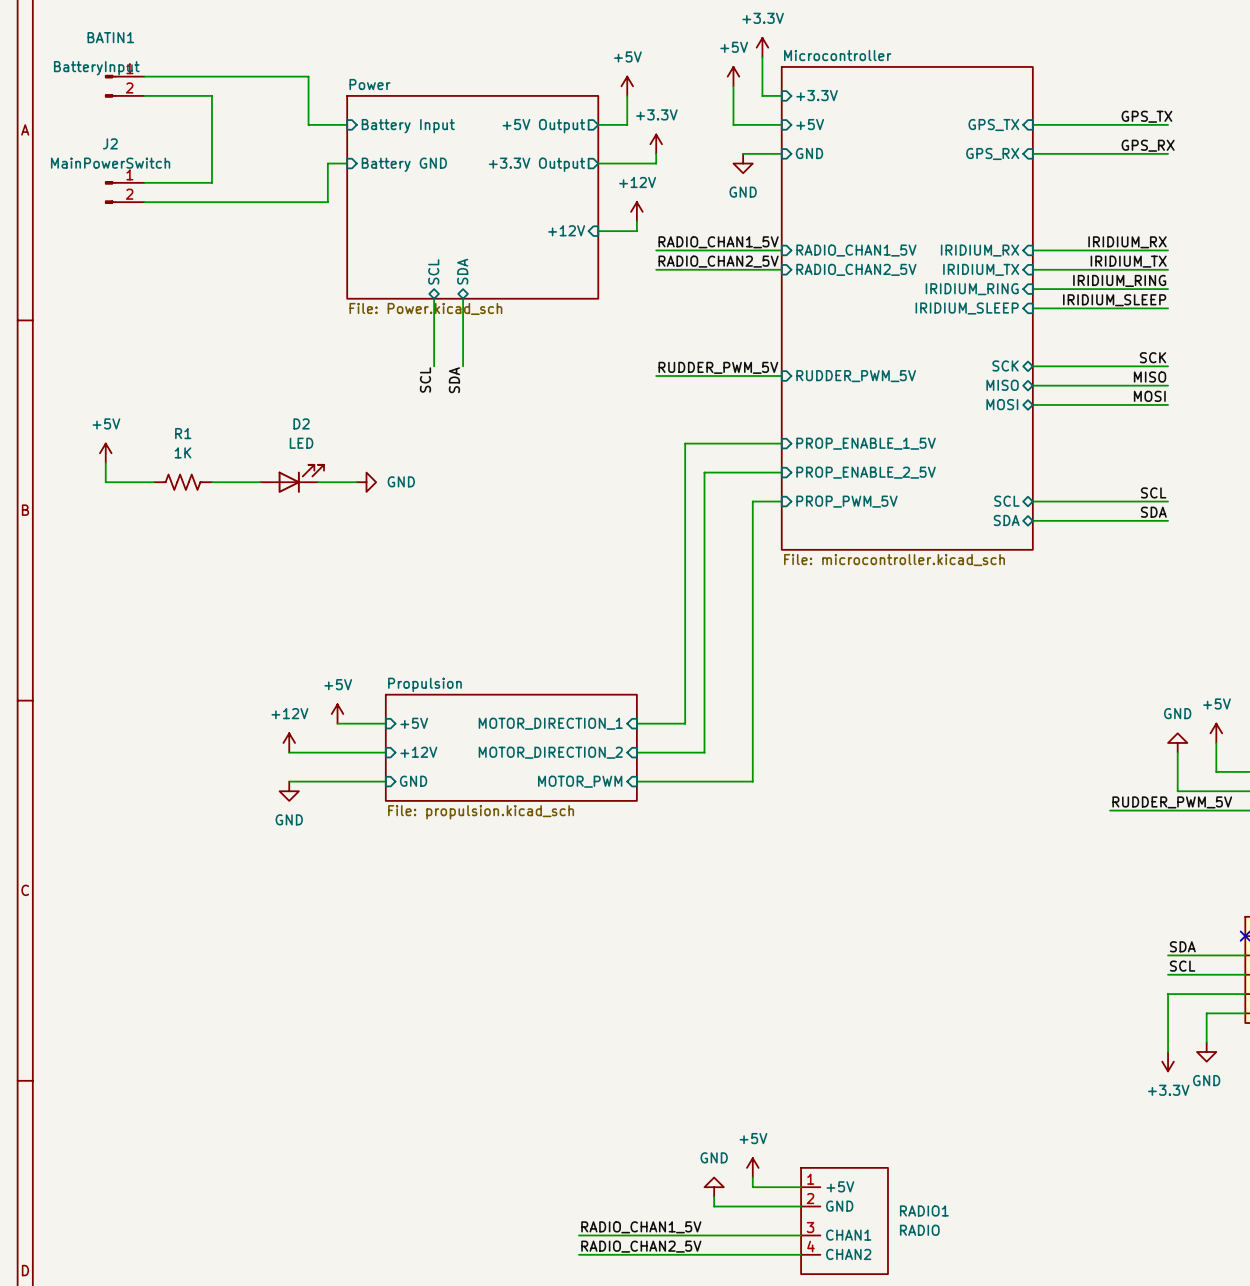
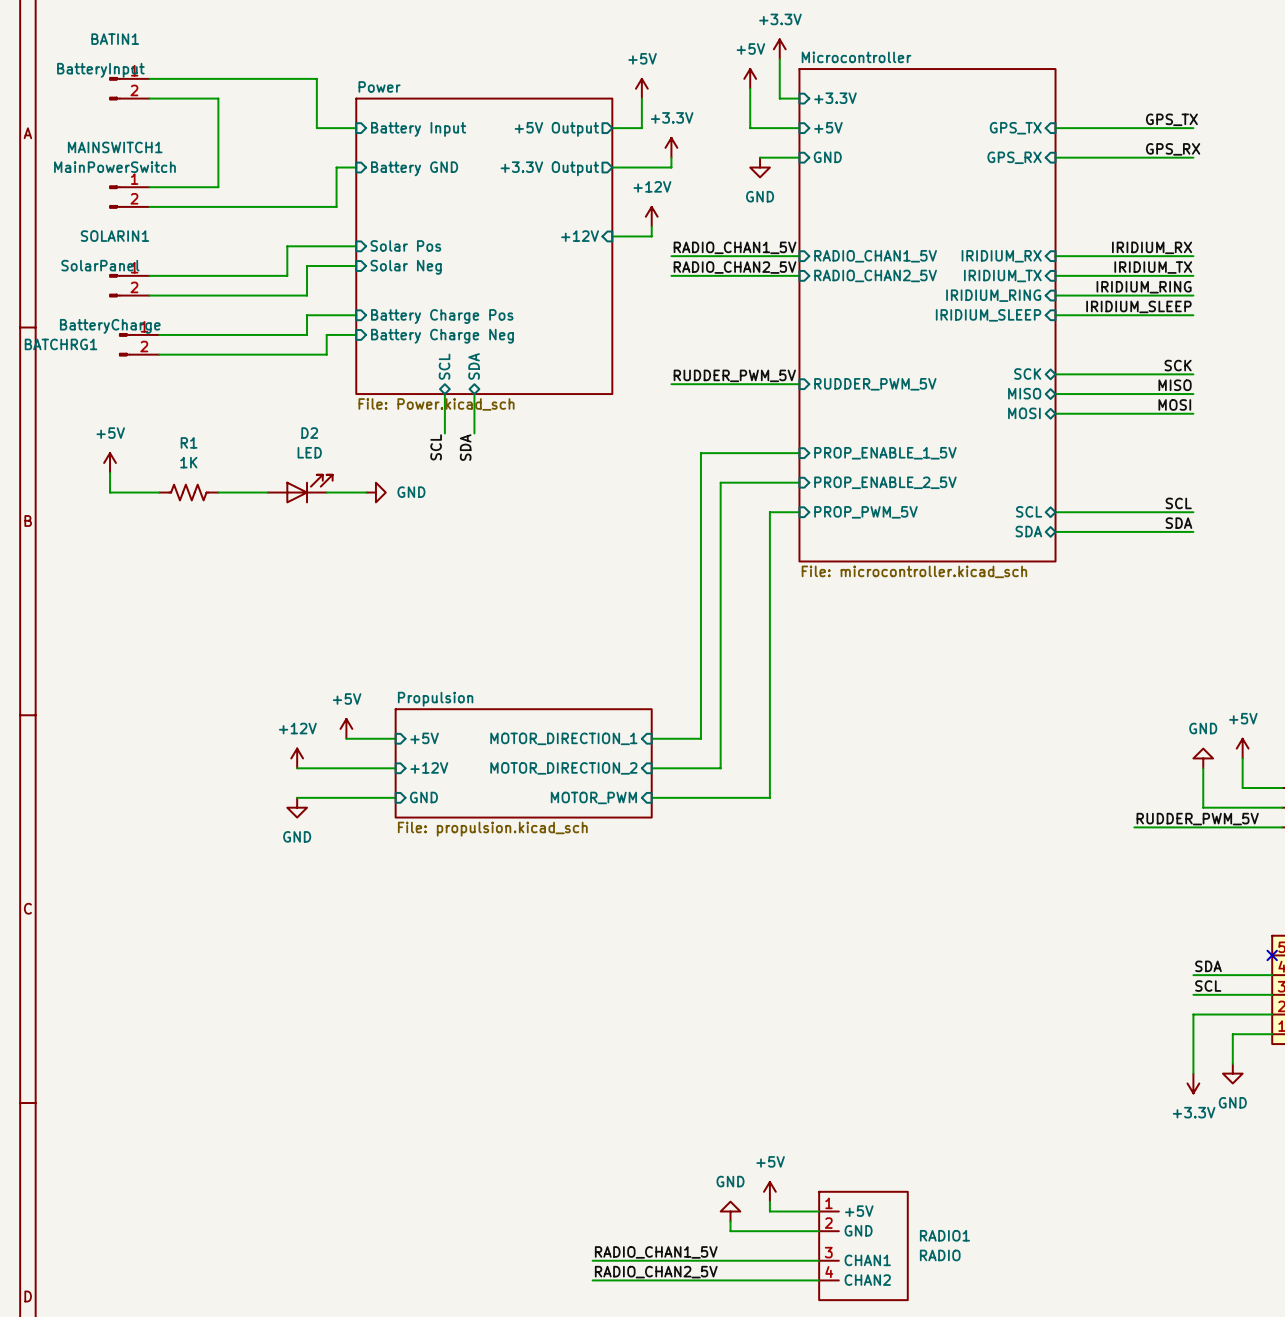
J2 name: J2 (110, 143) -> MAINSWITCH1 (115, 147)
sheet Power: File: Power.kicad_sch (472, 197) -> none
wire: none -> (356, 246) (287, 246) (287, 275) (149, 275)
sheet pin: none -> Solar Pos (405, 245)
sheet Power: none -> File: Power.kicad_sch (484, 246)
wire: none -> (356, 266) (307, 266) (307, 295) (149, 295)
sheet pin: none -> Solar Neg (406, 267)
sheet pin position: SCL (433, 271) -> SCL (444, 366)
sheet pin position: SDA (462, 271) -> SDA (474, 366)
SOLARIN1: none -> SolarPanel (129, 285)
wire: (434, 298) (434, 366) -> none
wire: (463, 298) (463, 366) -> none
wire: none -> (356, 315) (307, 315) (307, 334) (159, 334)
sheet pin: none -> Battery Charge Pos (442, 316)
wire: none -> (356, 334) (326, 334) (326, 354) (159, 354)
sheet pin: none -> Battery Charge Neg (442, 336)
BATCHRG1: none -> BatteryCharge (139, 344)
label position: SCL (425, 379) -> SCL (436, 447)
label position: SDA (454, 380) -> SDA (465, 447)
wire: none -> (444, 394) (444, 433)
wire: none -> (474, 394) (474, 433)

